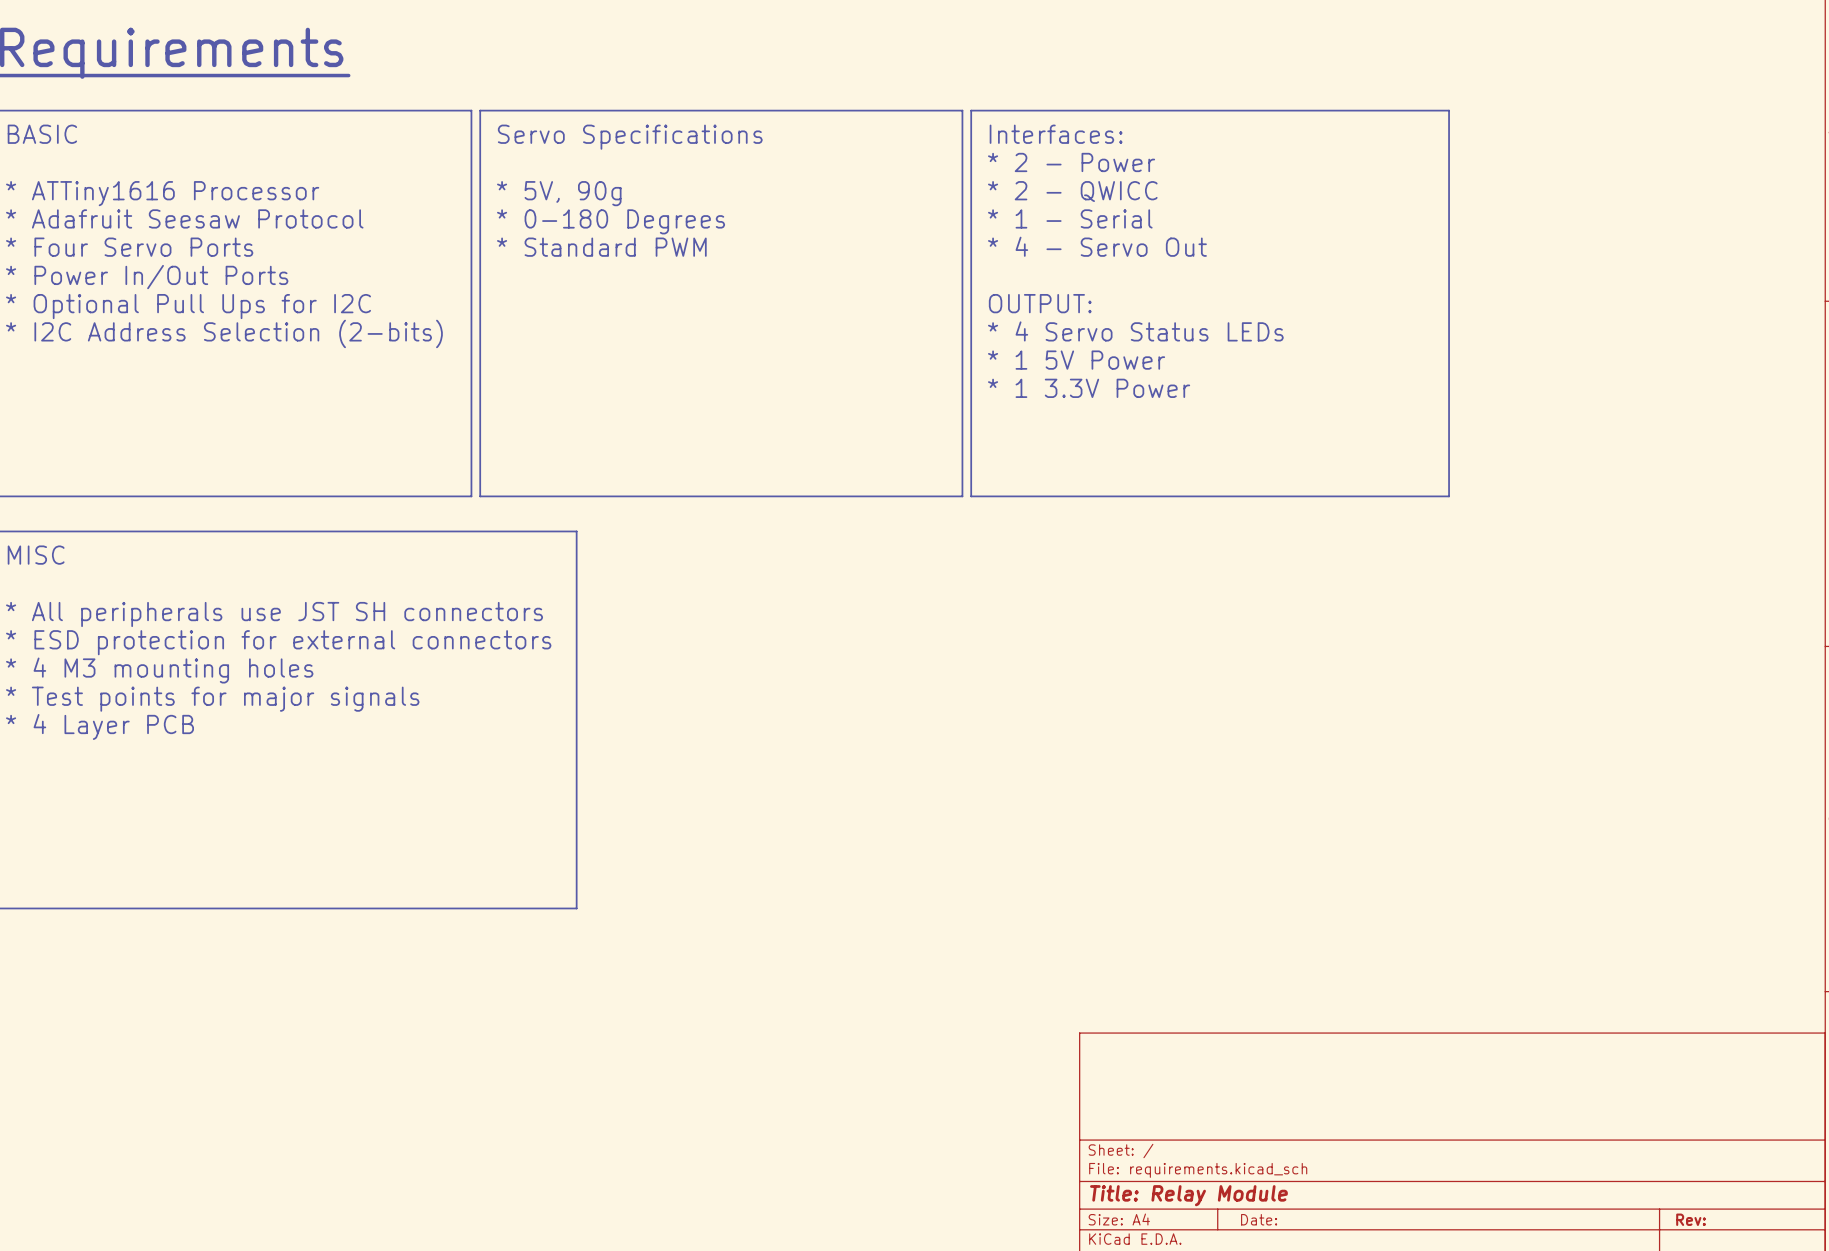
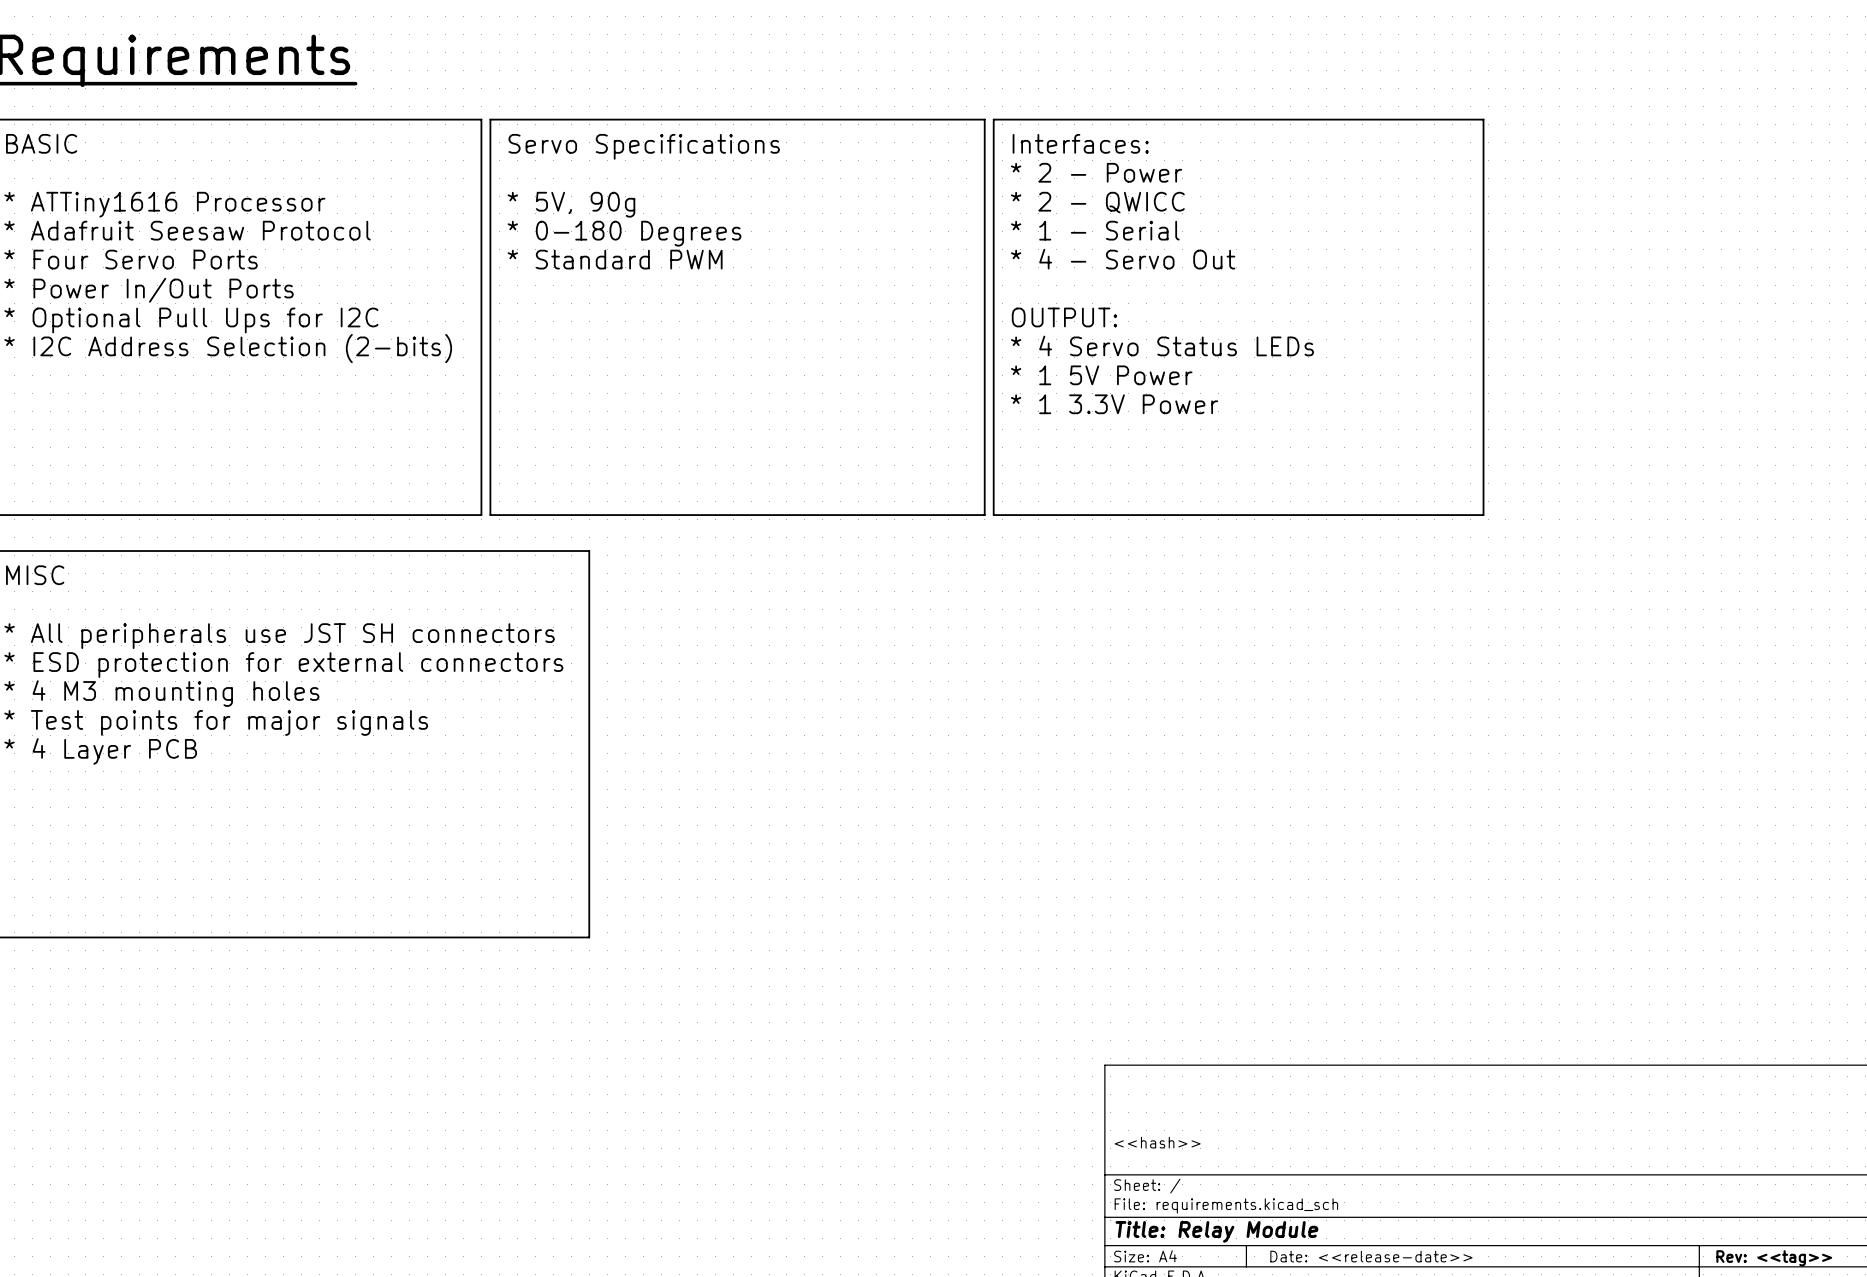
title block: none -> <<hash>> (1157, 1142)
title block: Date: (1259, 1219) -> Date: <<release-date>> (1371, 1256)
title block: Rev: (1691, 1219) -> Rev: <<tag>> (1774, 1258)

